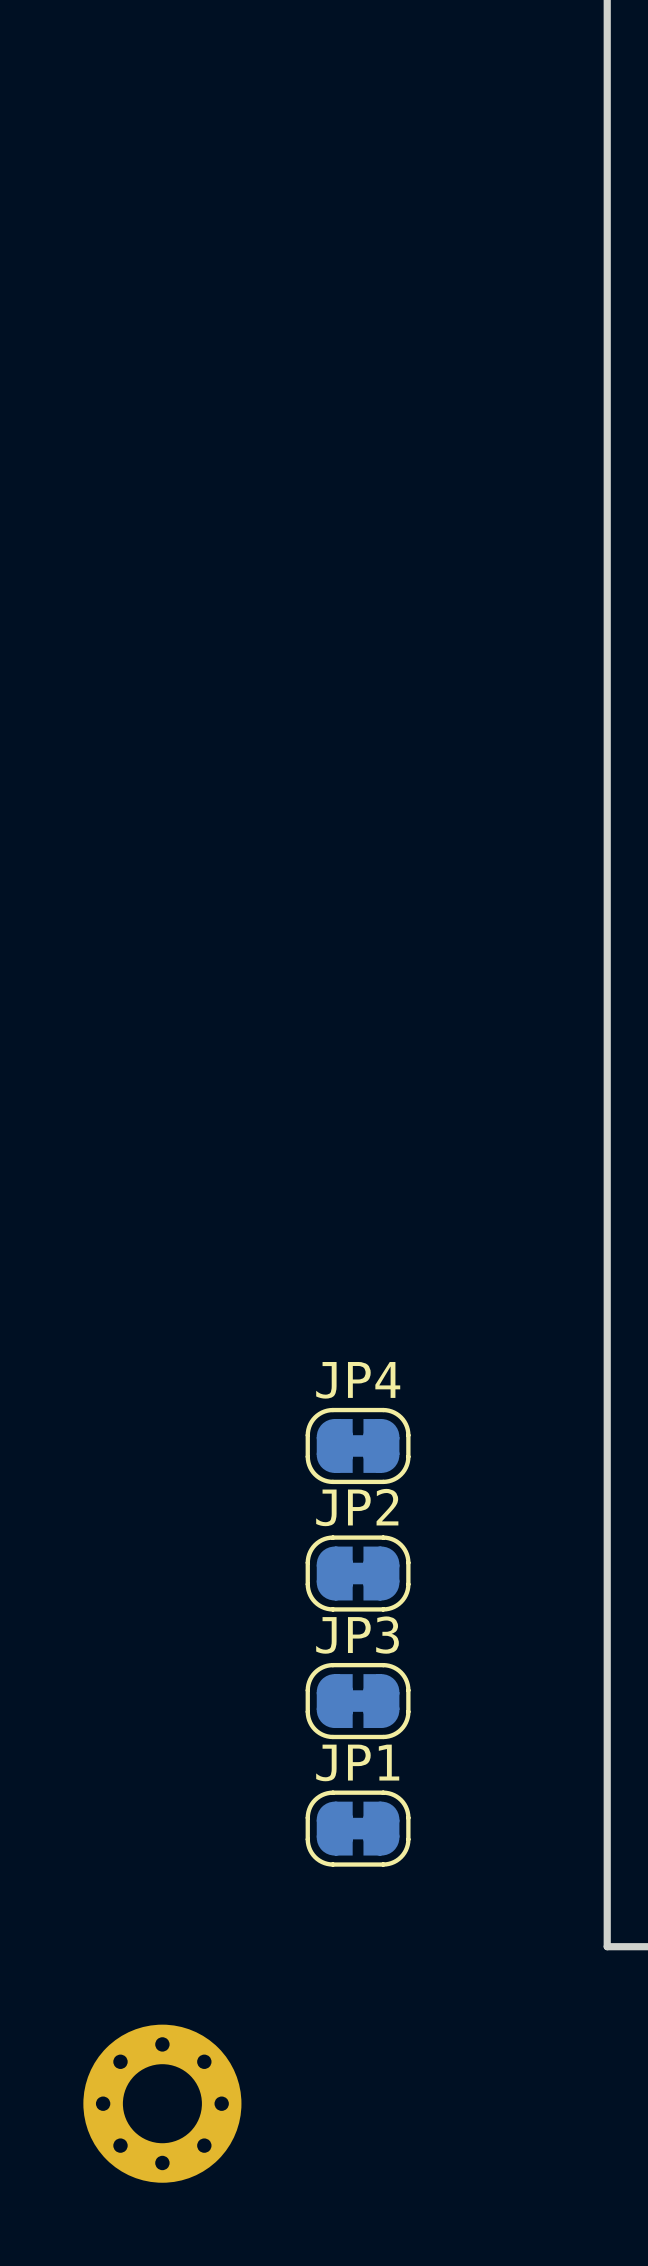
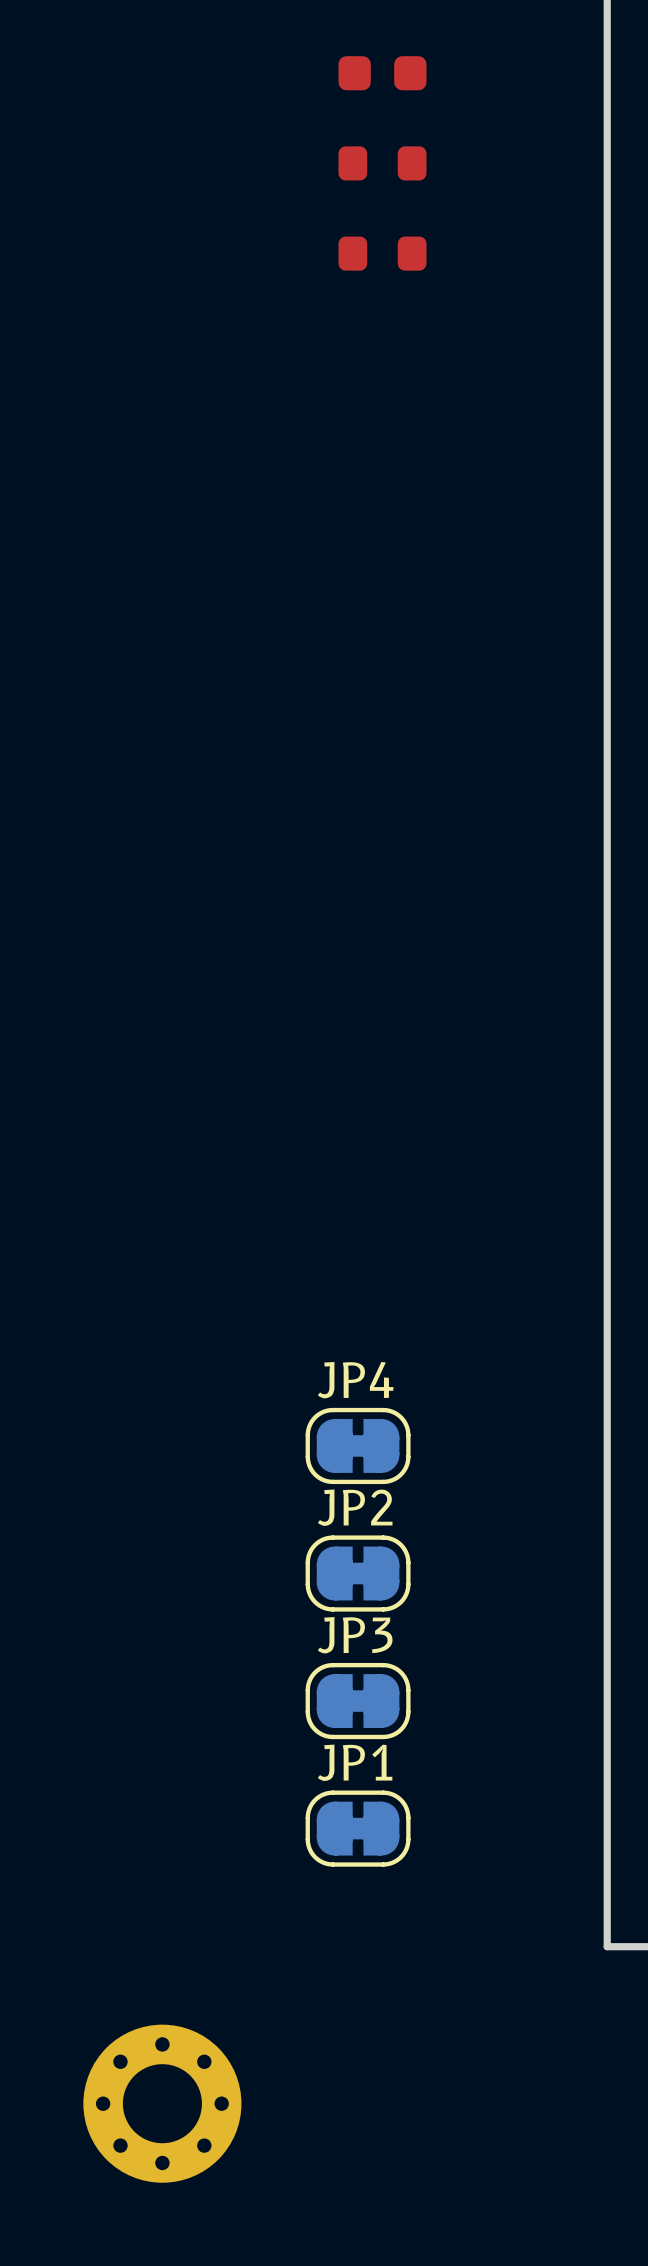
part: none -> (382, 73)
part: none -> (382, 163)
part: none -> (382, 253)

